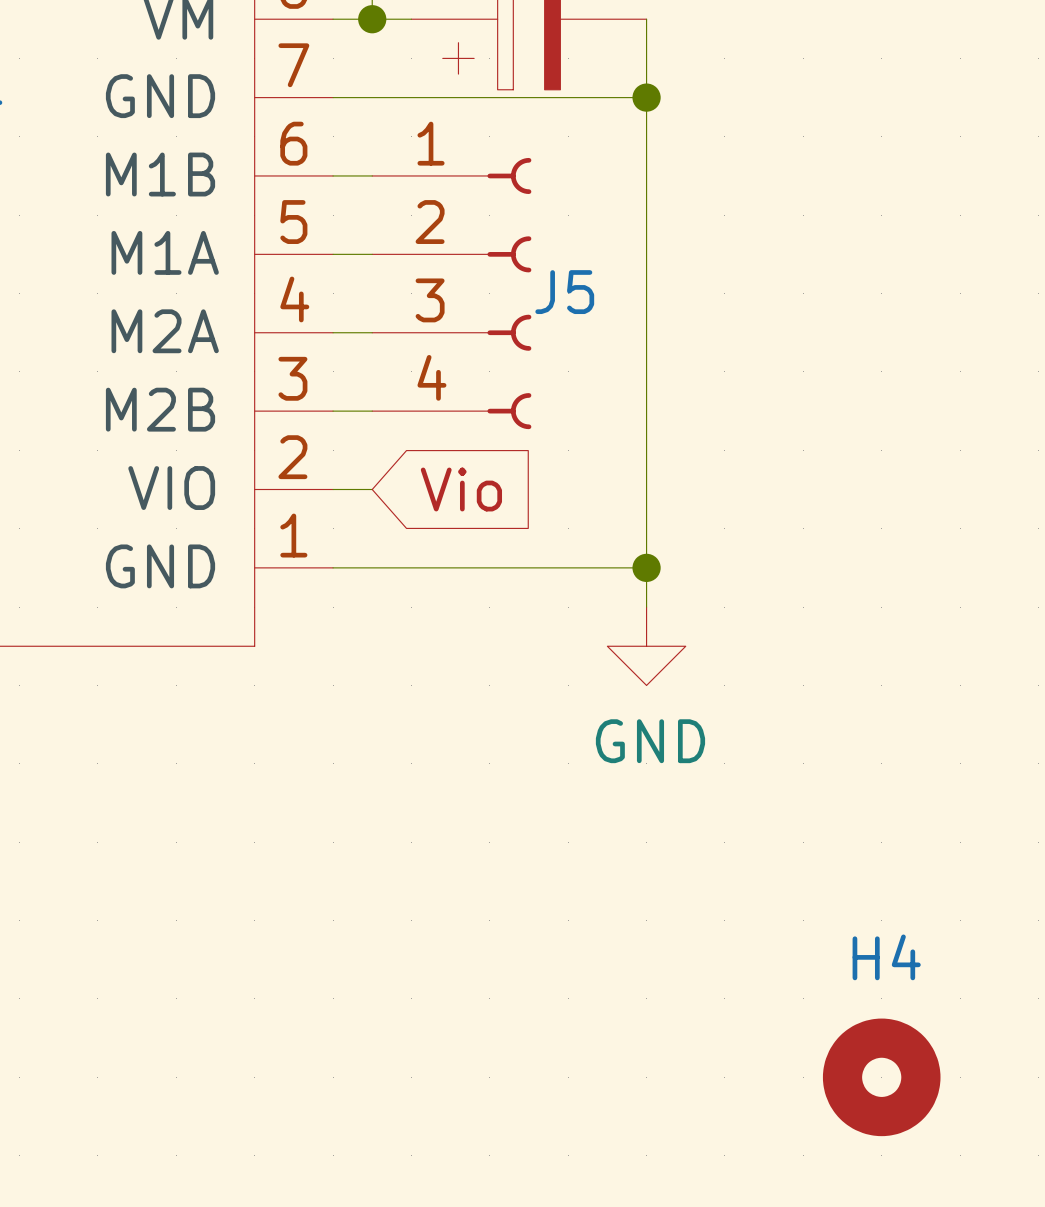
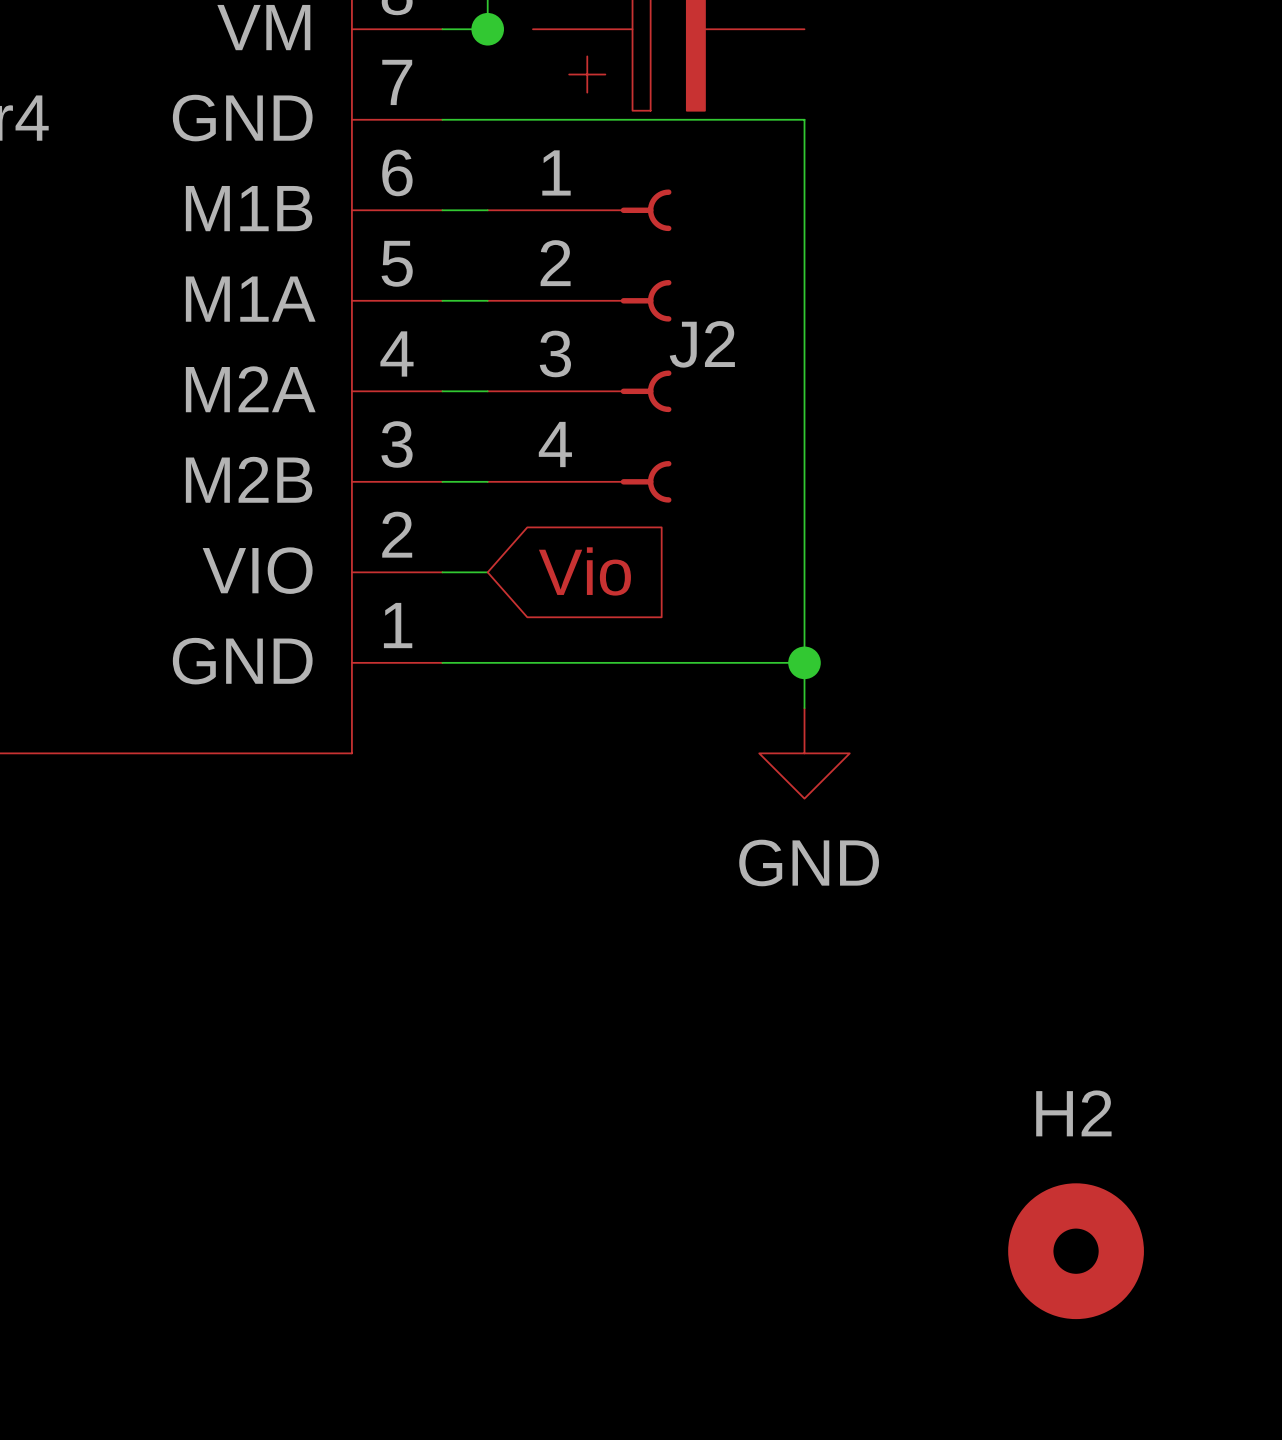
wire: (372, 19) (411, 19) -> none
wire: (646, 19) (646, 97) -> none
junction: (646, 97) -> none
J5 name: J5 (564, 292) -> J2 (702, 344)
H4 name: H4 (886, 957) -> H2 (1073, 1113)

